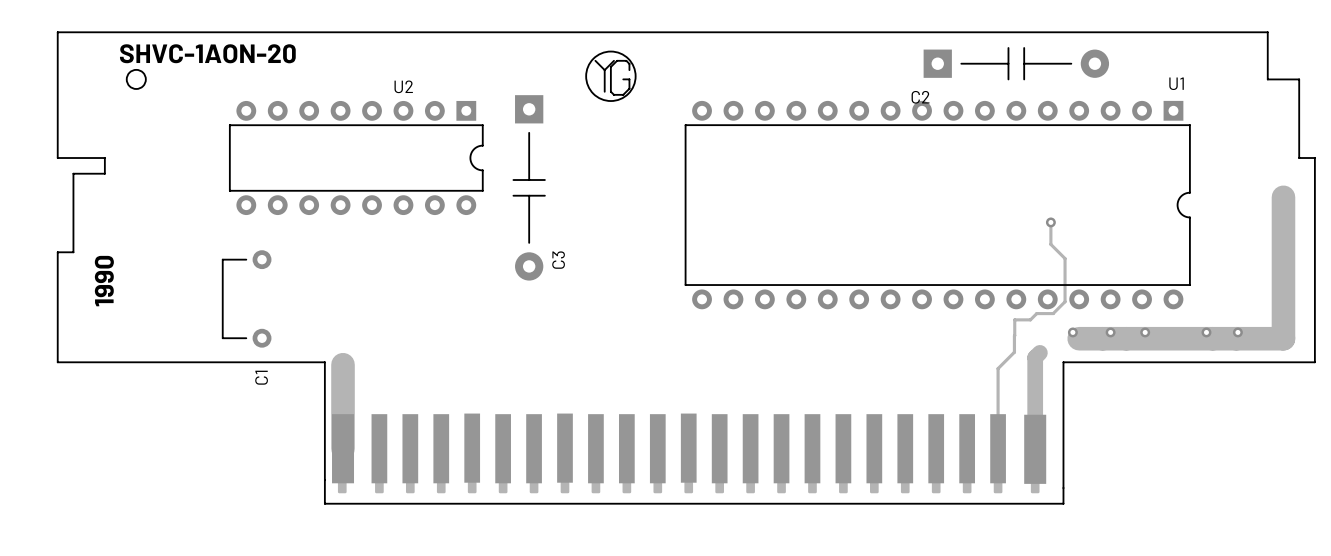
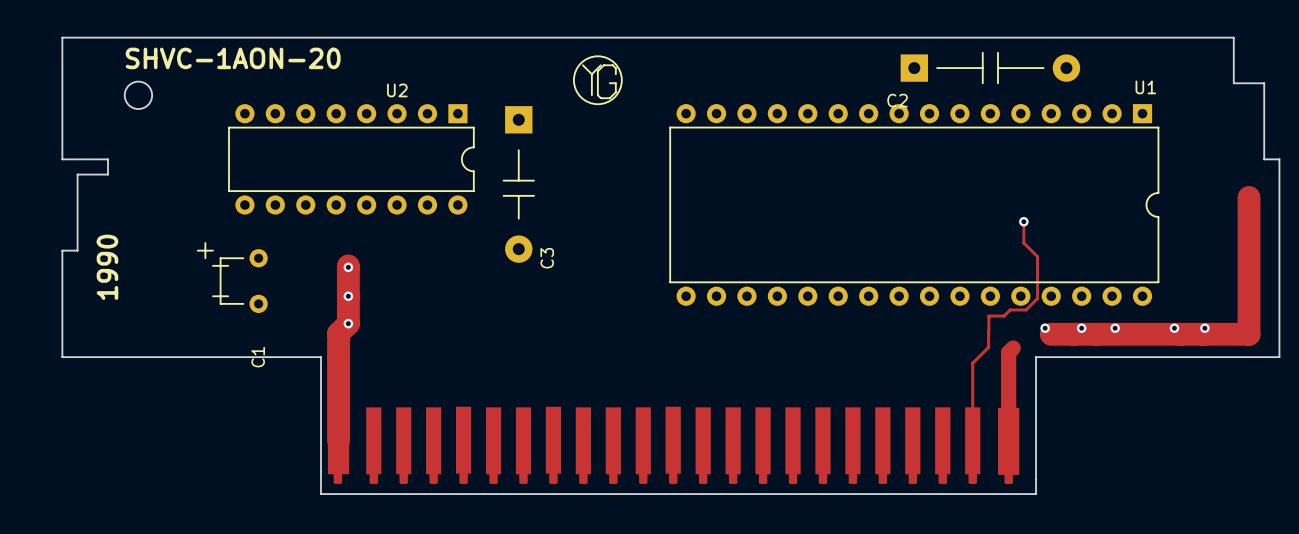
round board edge: [126, 69, 147, 90] -> none
round board edge: none -> [124, 81, 153, 110]
C3 footprint: [512, 95, 546, 281] -> [502, 106, 535, 263]
C1 footprint: [222, 250, 272, 348] -> [197, 242, 268, 314]
track: none -> (348, 265) (348, 323) (338, 333) (338, 359)
via: none -> (348, 267)
via: none -> (348, 296)
via: none -> (348, 323)

